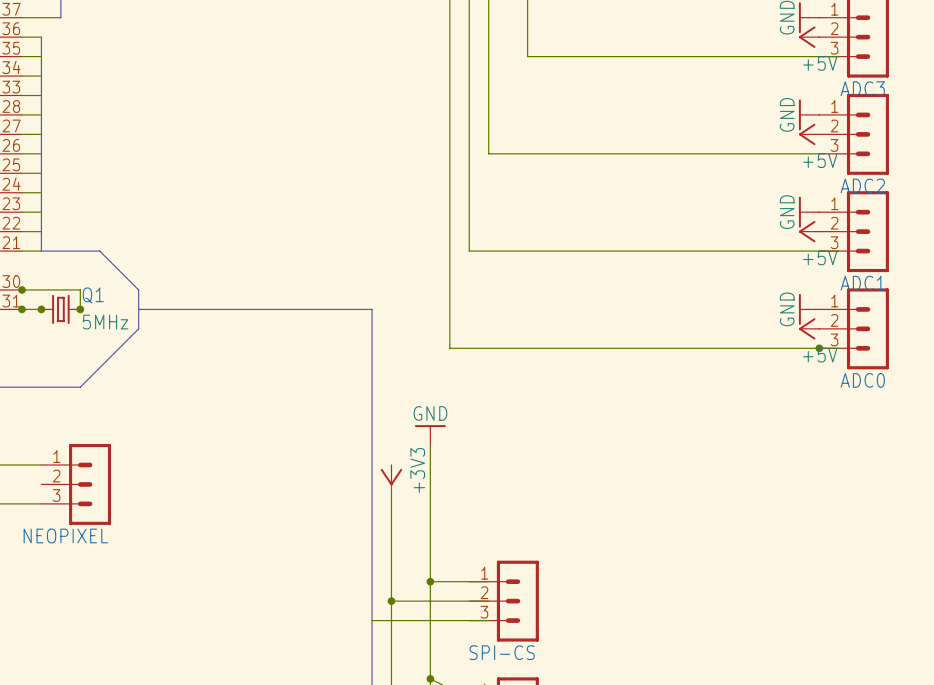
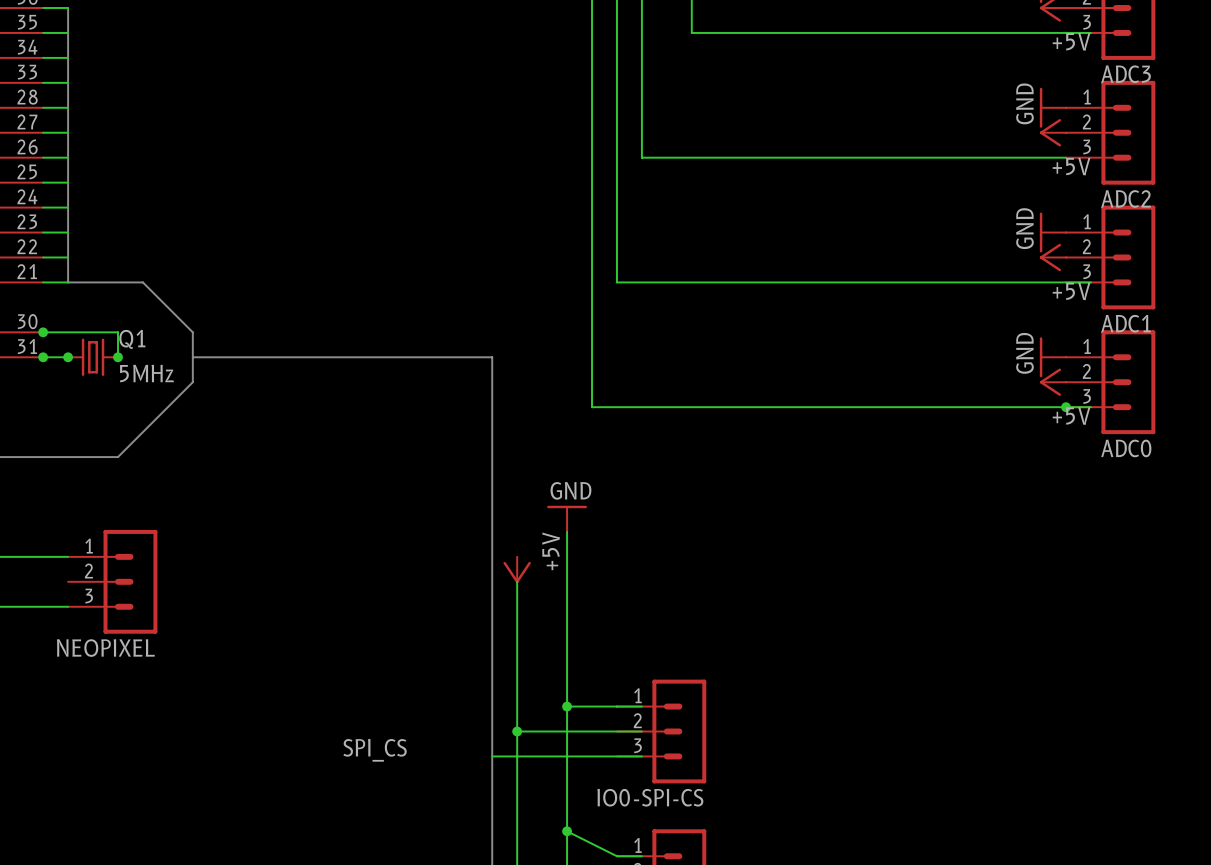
power symbol: +3V3 (391, 475) -> +5V (517, 569)
label: none -> SPI_CS (375, 750)
SPI-CS name: SPI-CS (502, 652) -> IO0-SPI-CS (650, 797)

